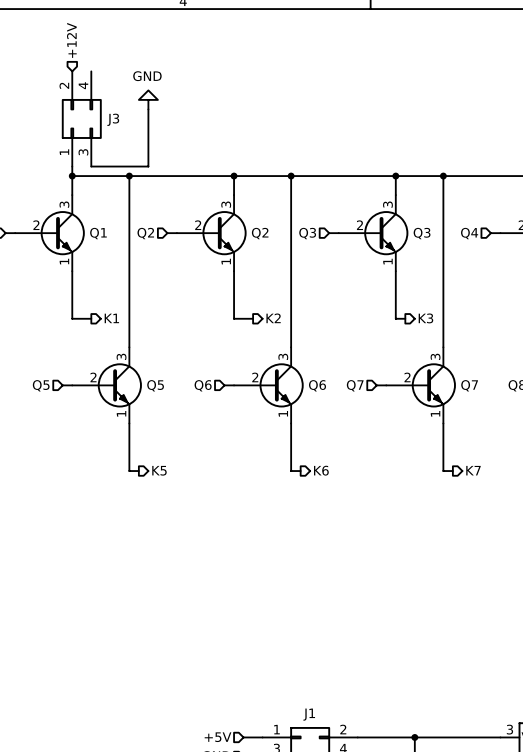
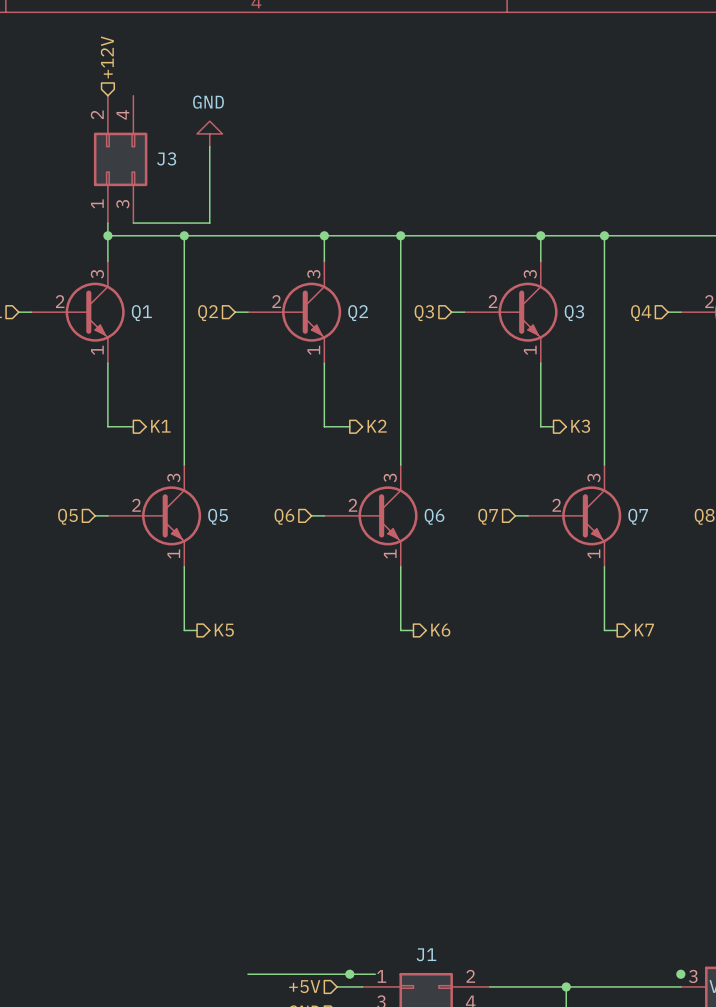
wire: none -> (247, 974) (375, 974)
junction: none -> (349, 974)
junction: none -> (680, 974)

